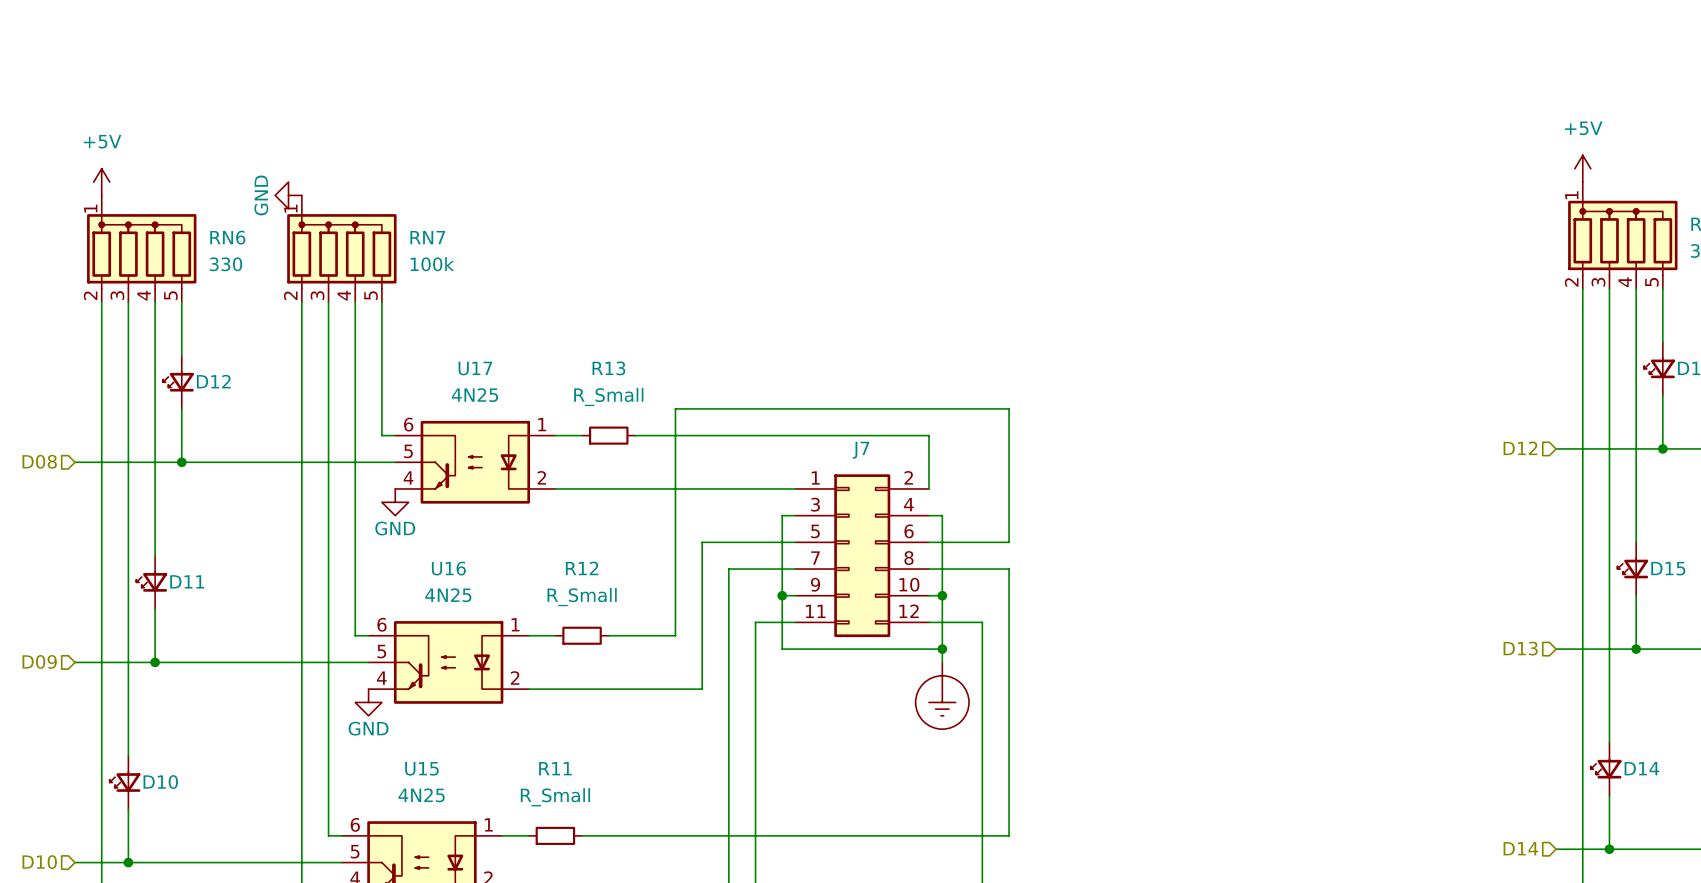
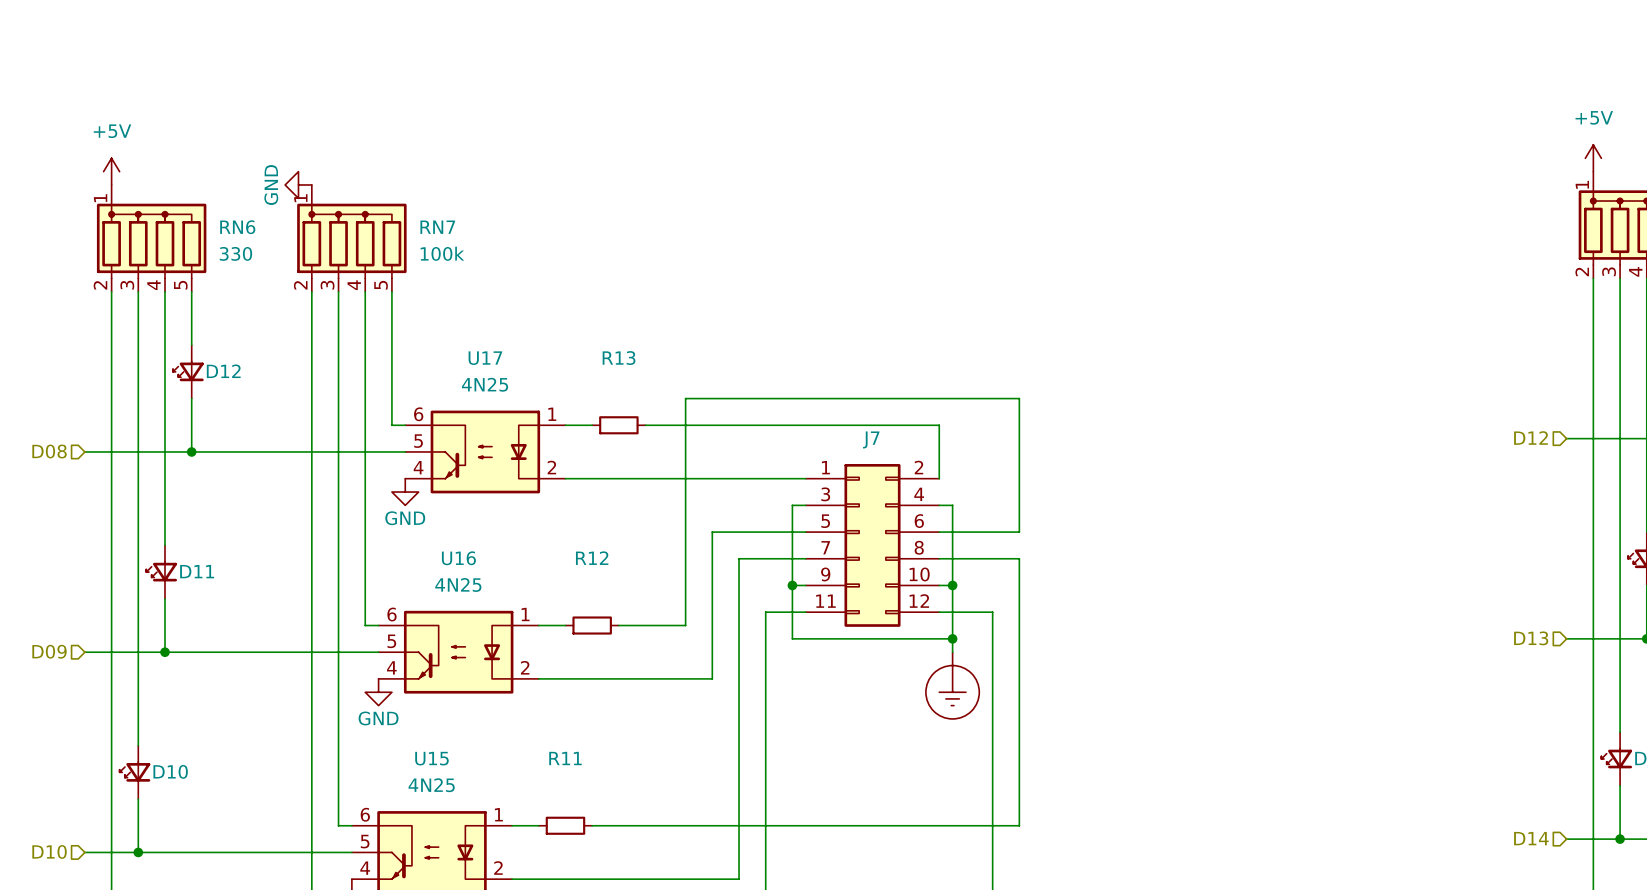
R13 value: R_Small (608, 396) -> none
R12 value: R_Small (582, 597) -> none
R11 value: R_Small (555, 797) -> none

